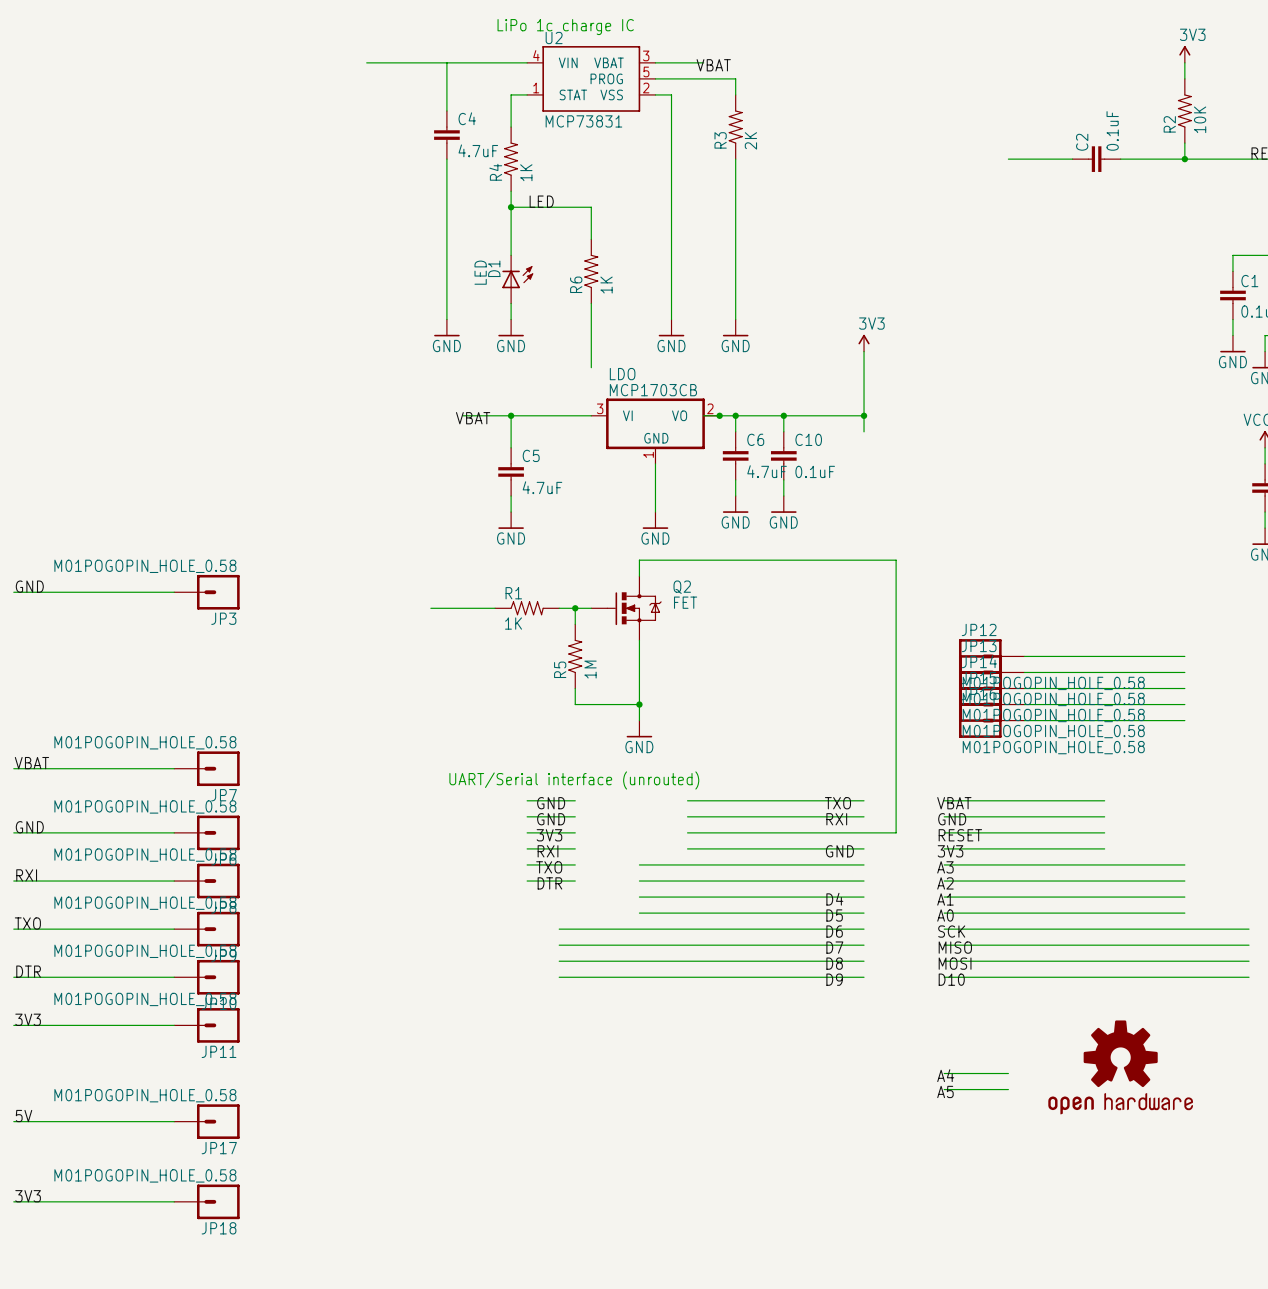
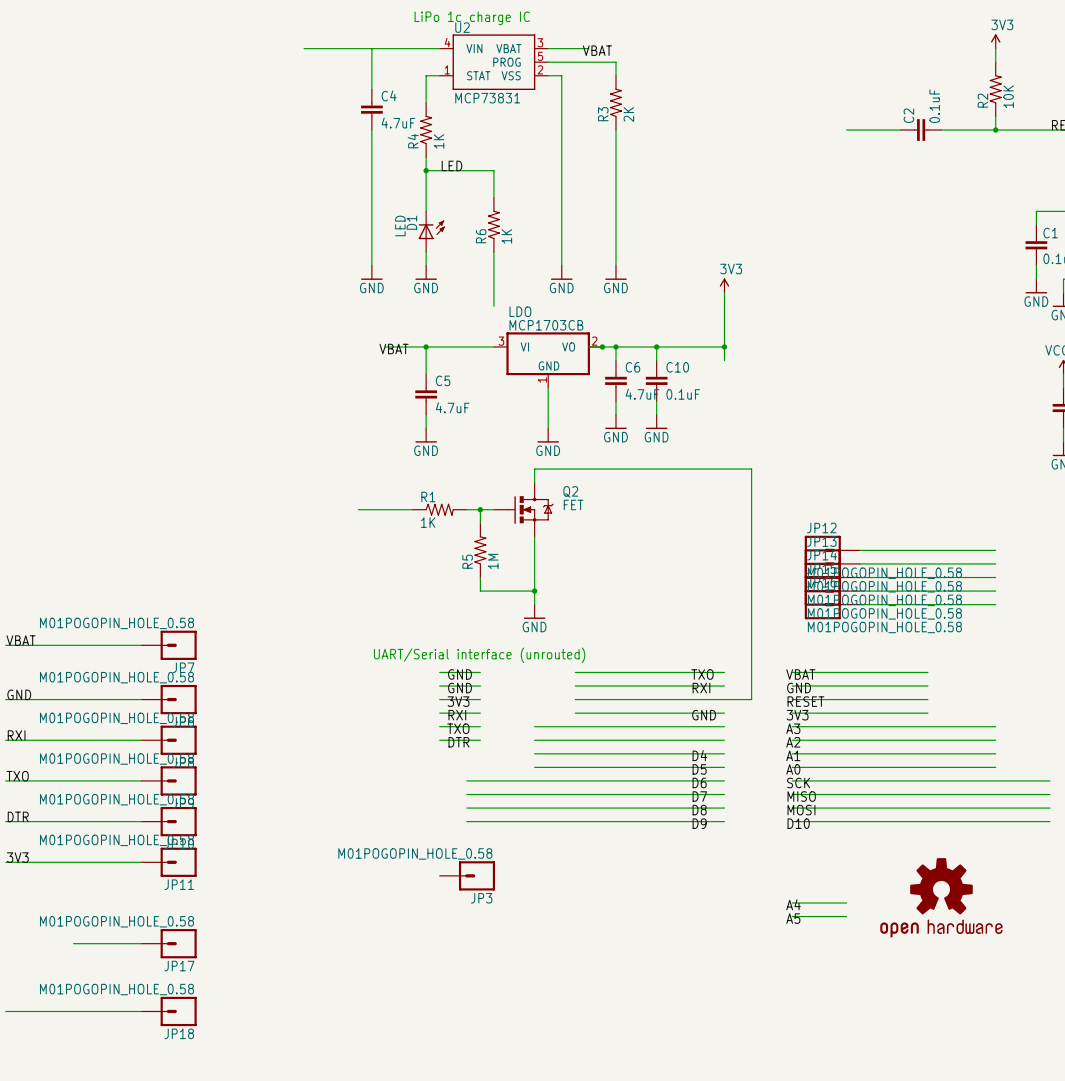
label: GND (29, 586) -> none
wire: (13, 592) (174, 592) -> none
JP3 position: (206, 592) -> (467, 875)
label: 5V (24, 1116) -> none
wire: (13, 1121) (94, 1121) -> none
label: 3V3 (28, 1196) -> none

